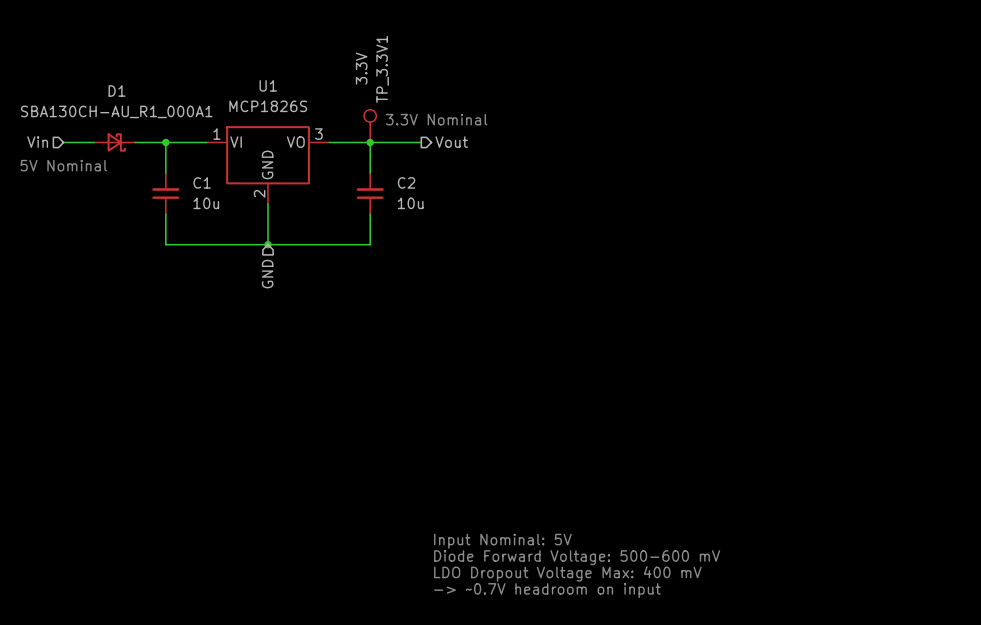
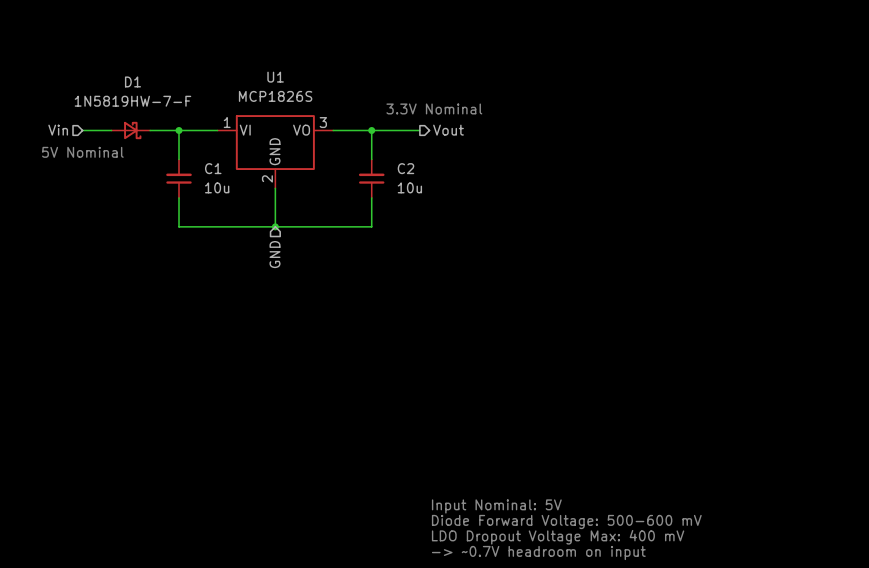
D1 value: SBA130CH-AU_R1_000A1 (116, 111) -> 1N5819HW-7-F (132, 101)
TP_3.3V1: 3.3V (370, 126) -> none

